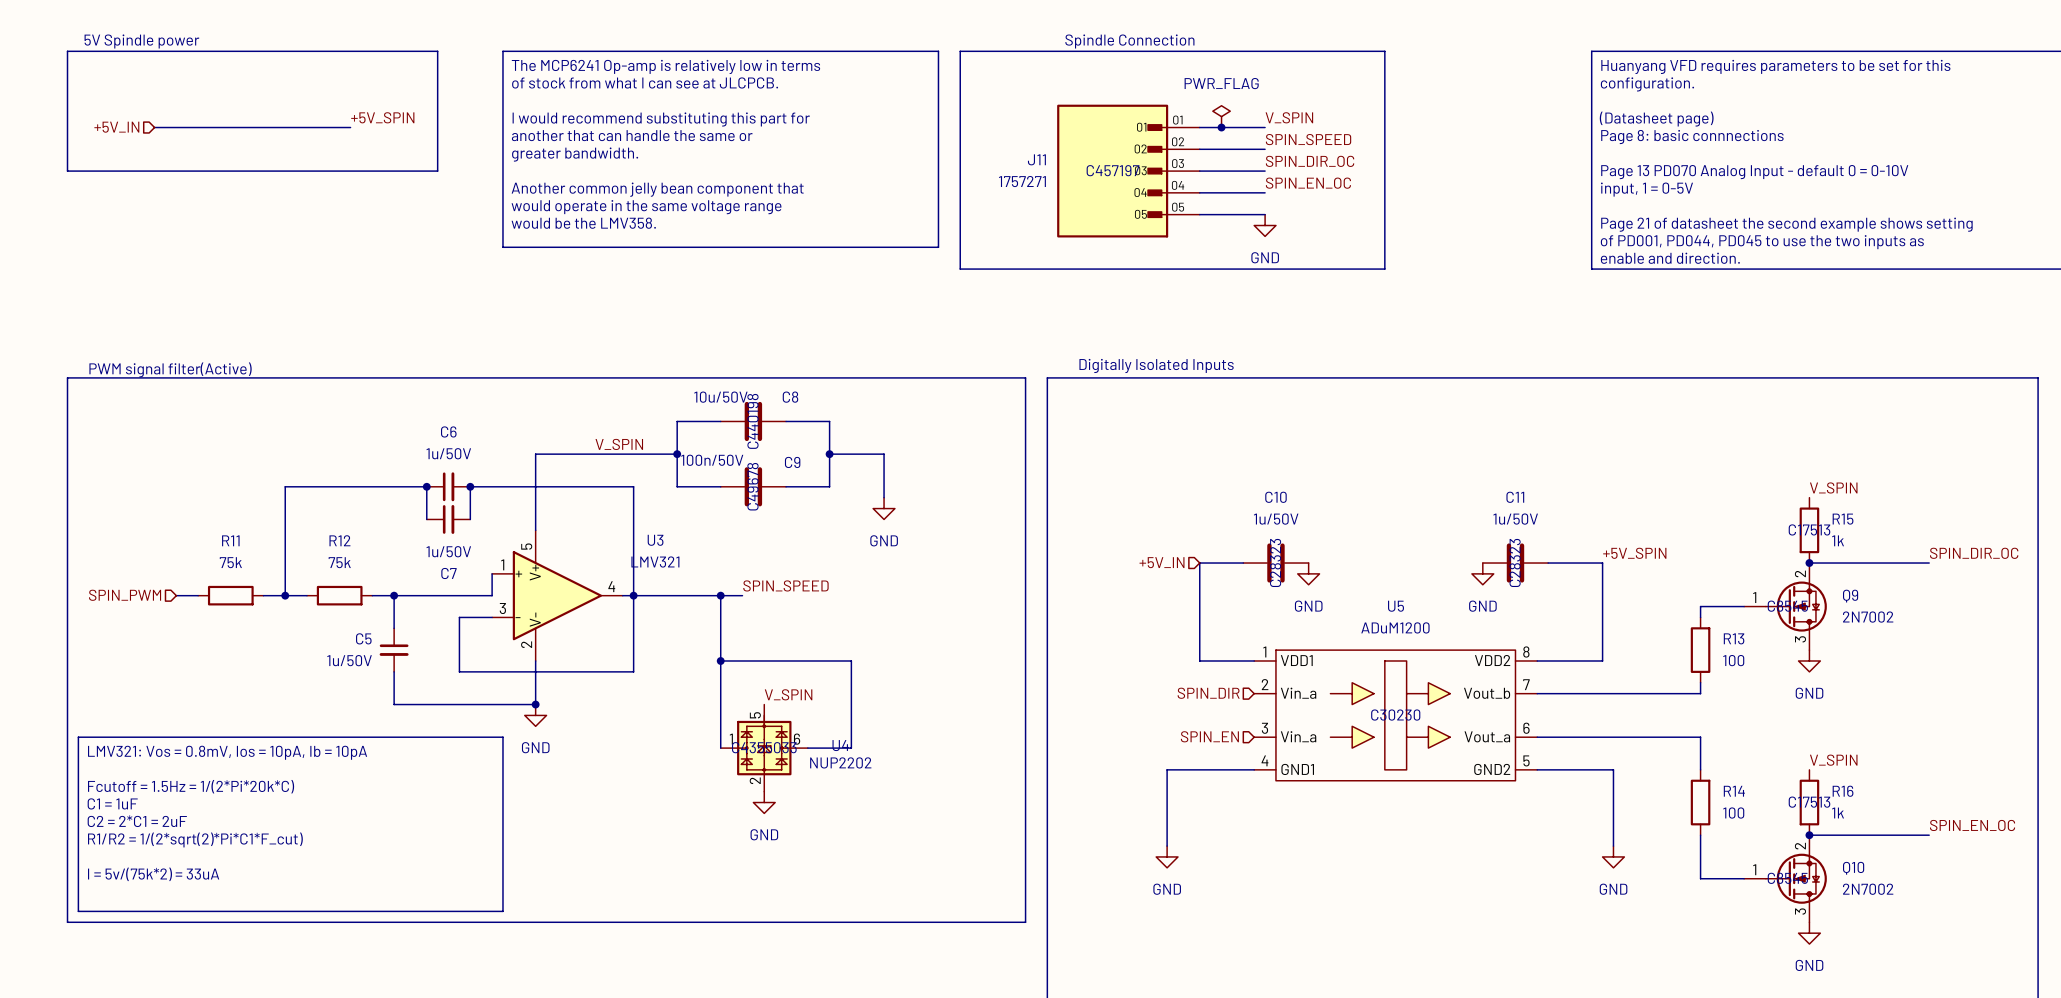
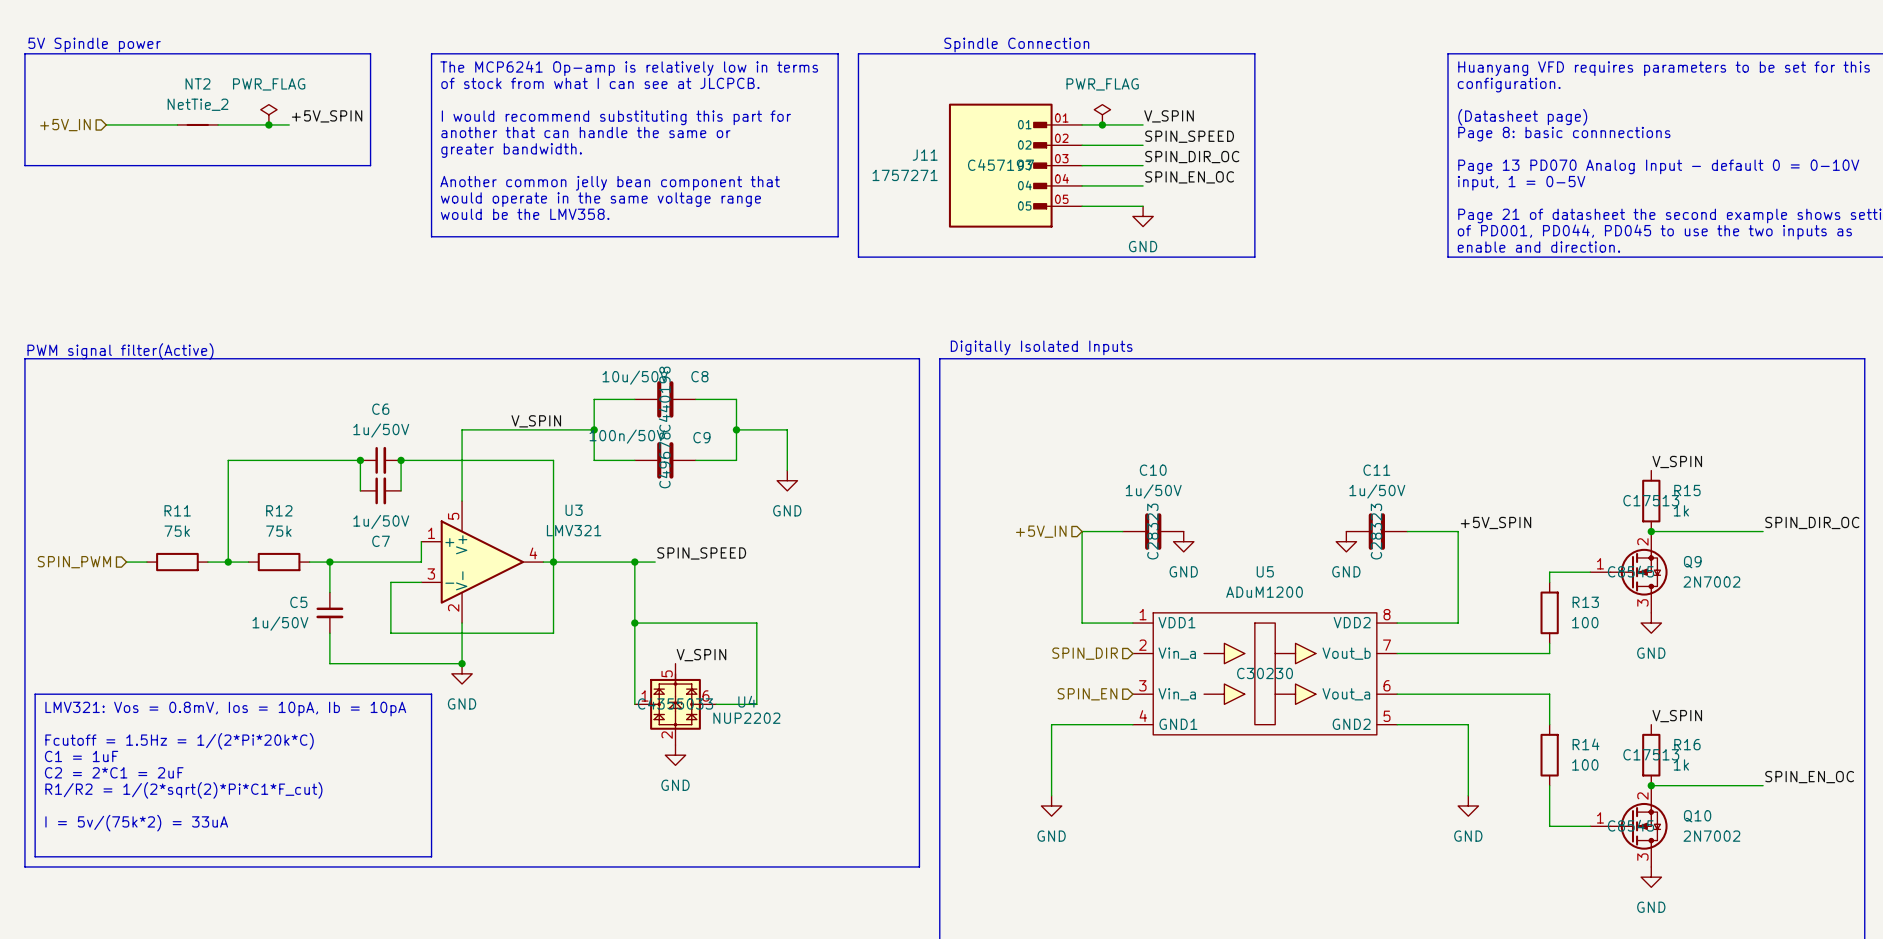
power symbol: none -> PWR_FLAG (268, 114)
NT2: none -> NetTie_2 (197, 124)
junction: none -> (268, 124)

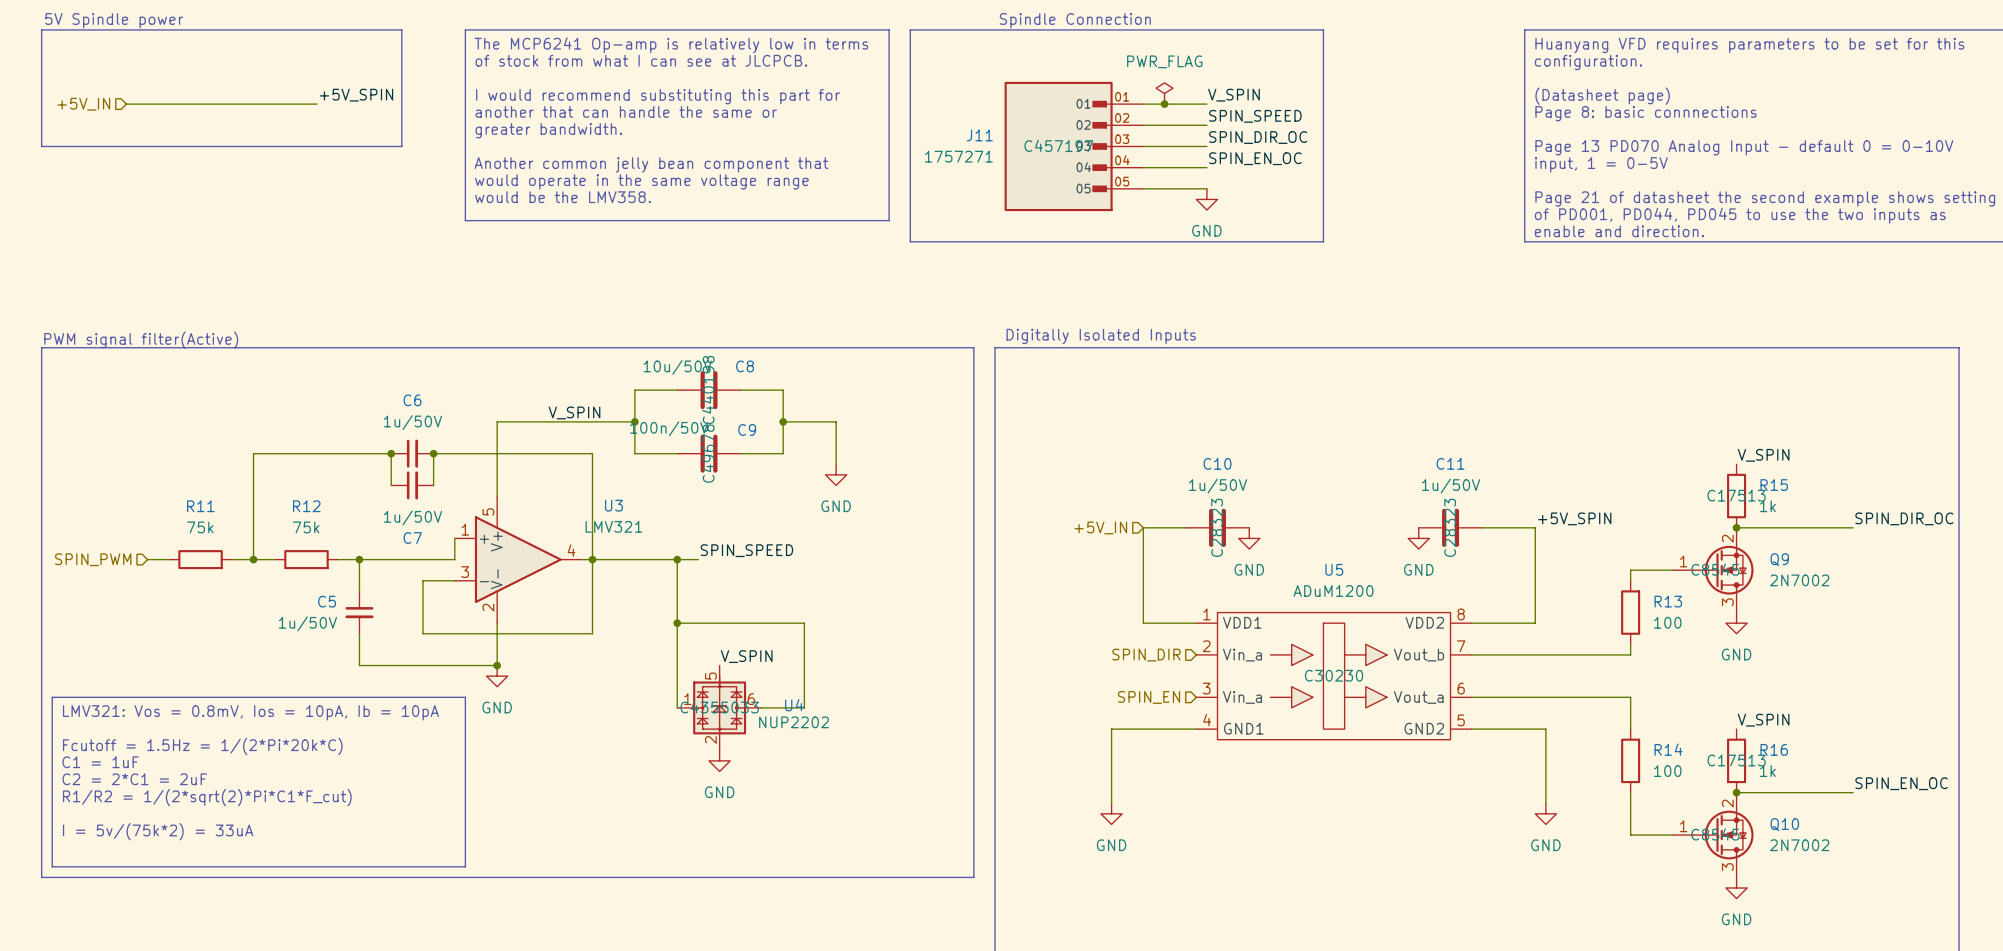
power symbol: PWR_FLAG (268, 114) -> none
NT2: NetTie_2 (197, 124) -> none
junction: (268, 124) -> none

